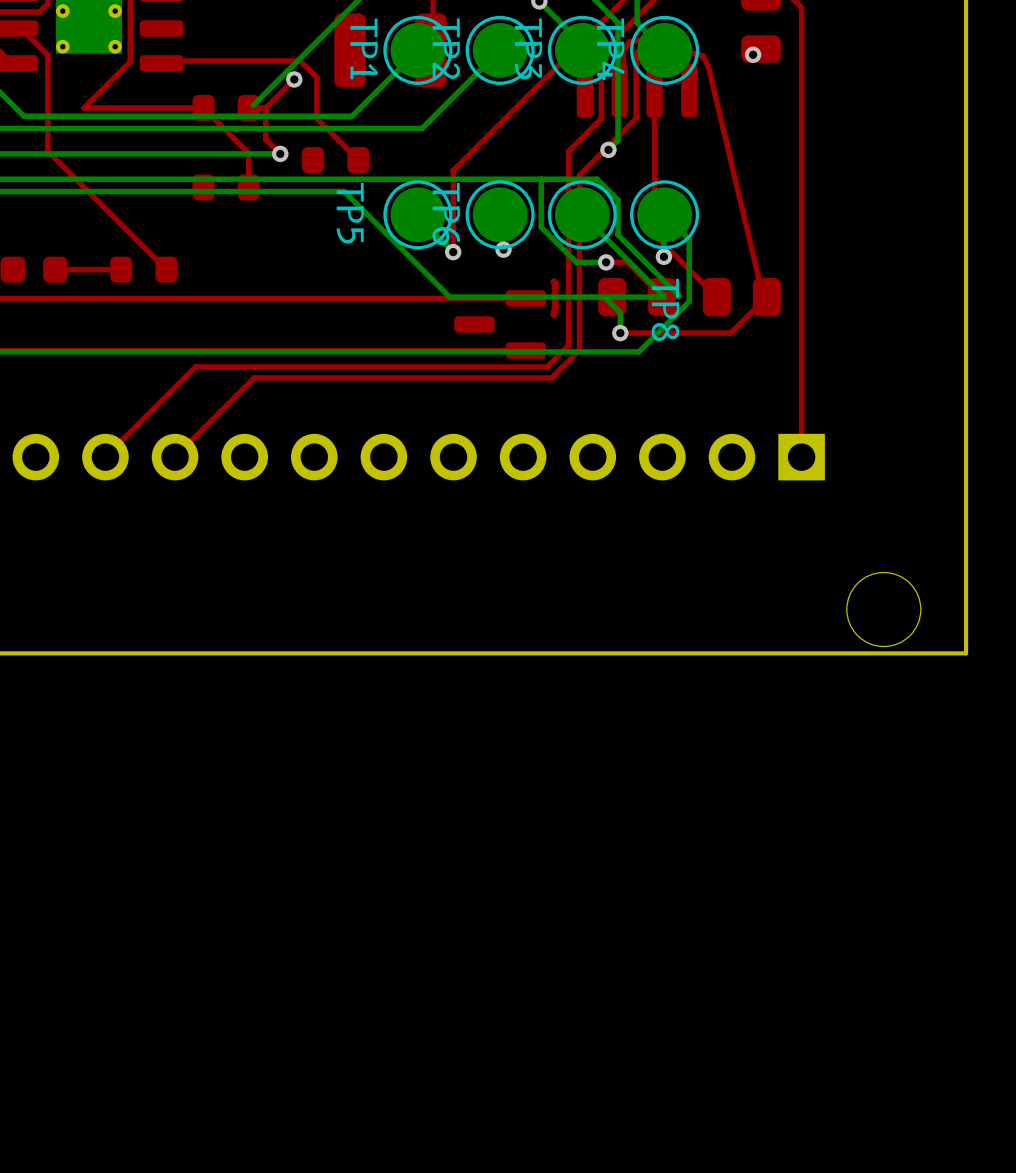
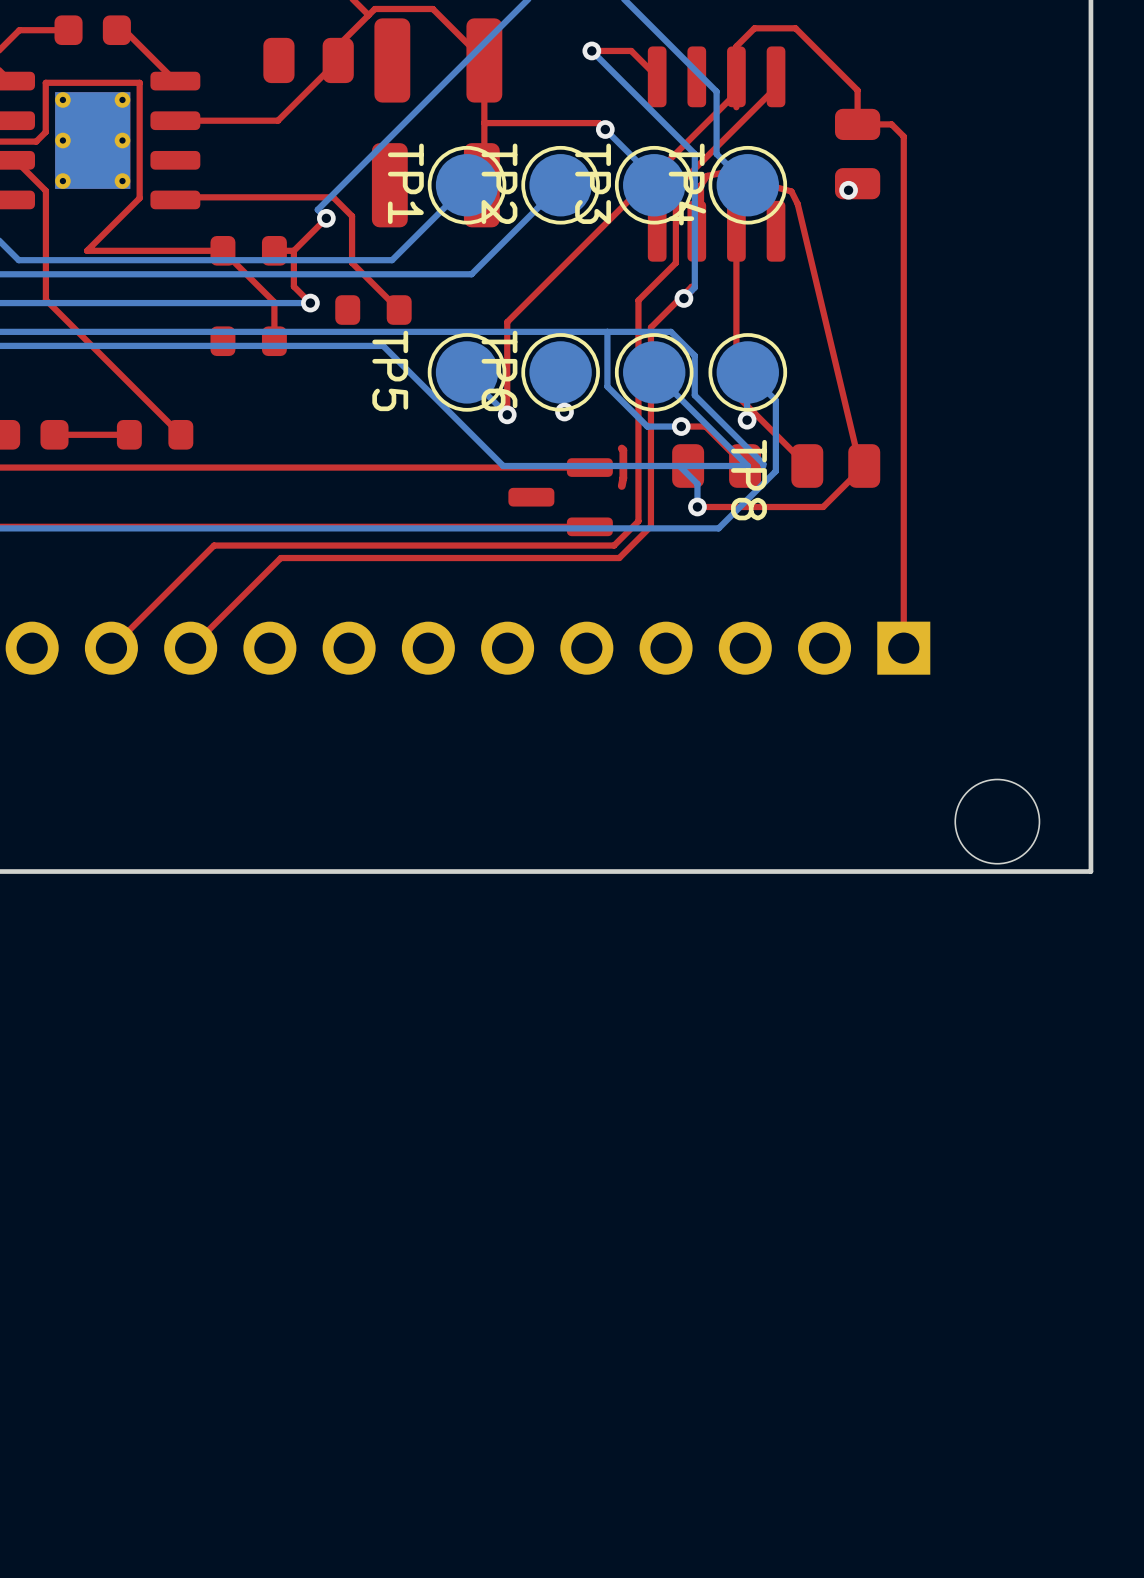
top track: (636, 52) (636, 118) (615, 139) -> none
bottom track: (286, 71) (253, 105) -> none

